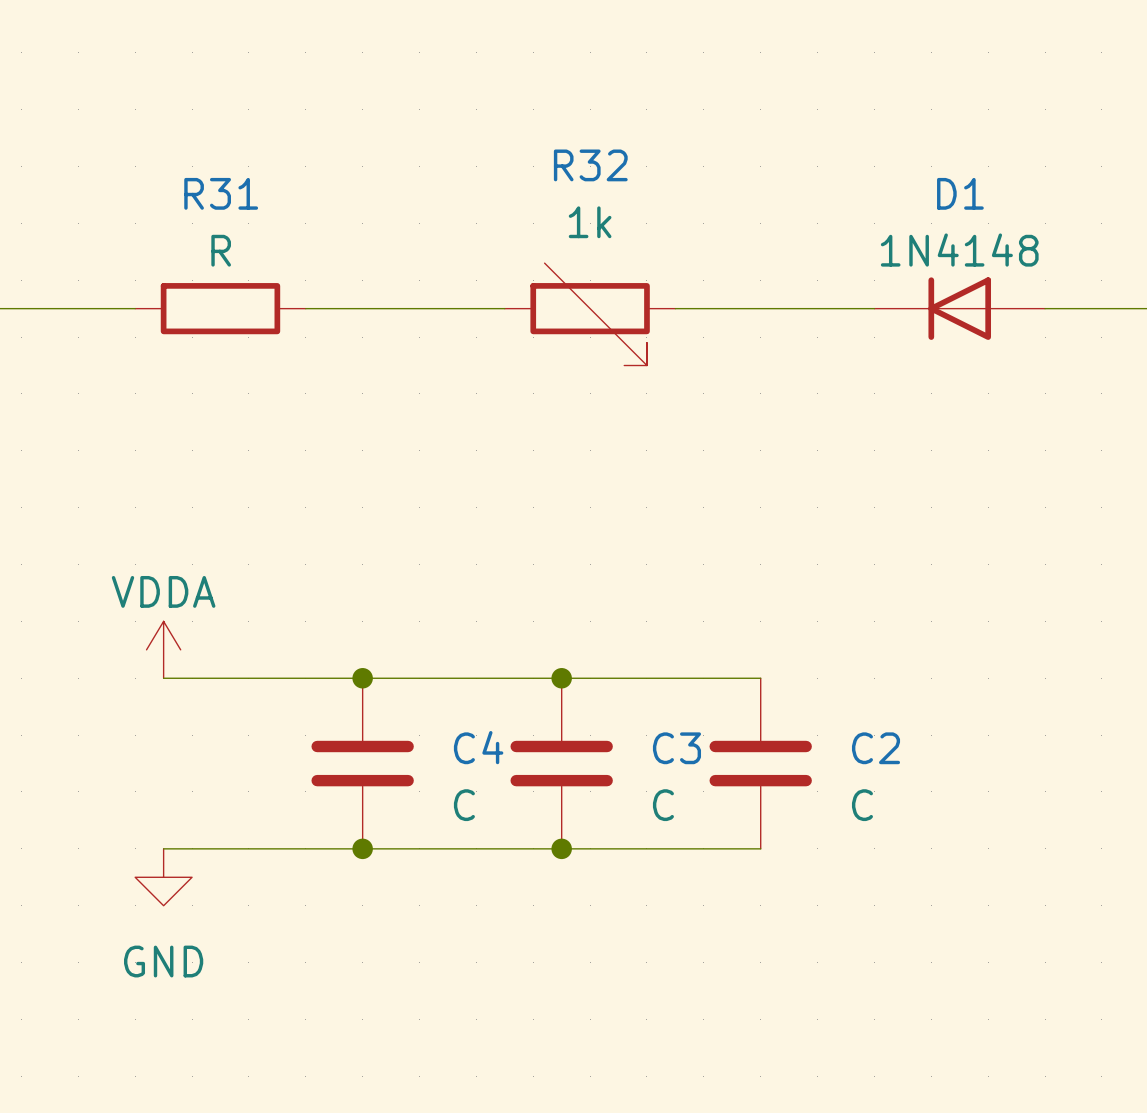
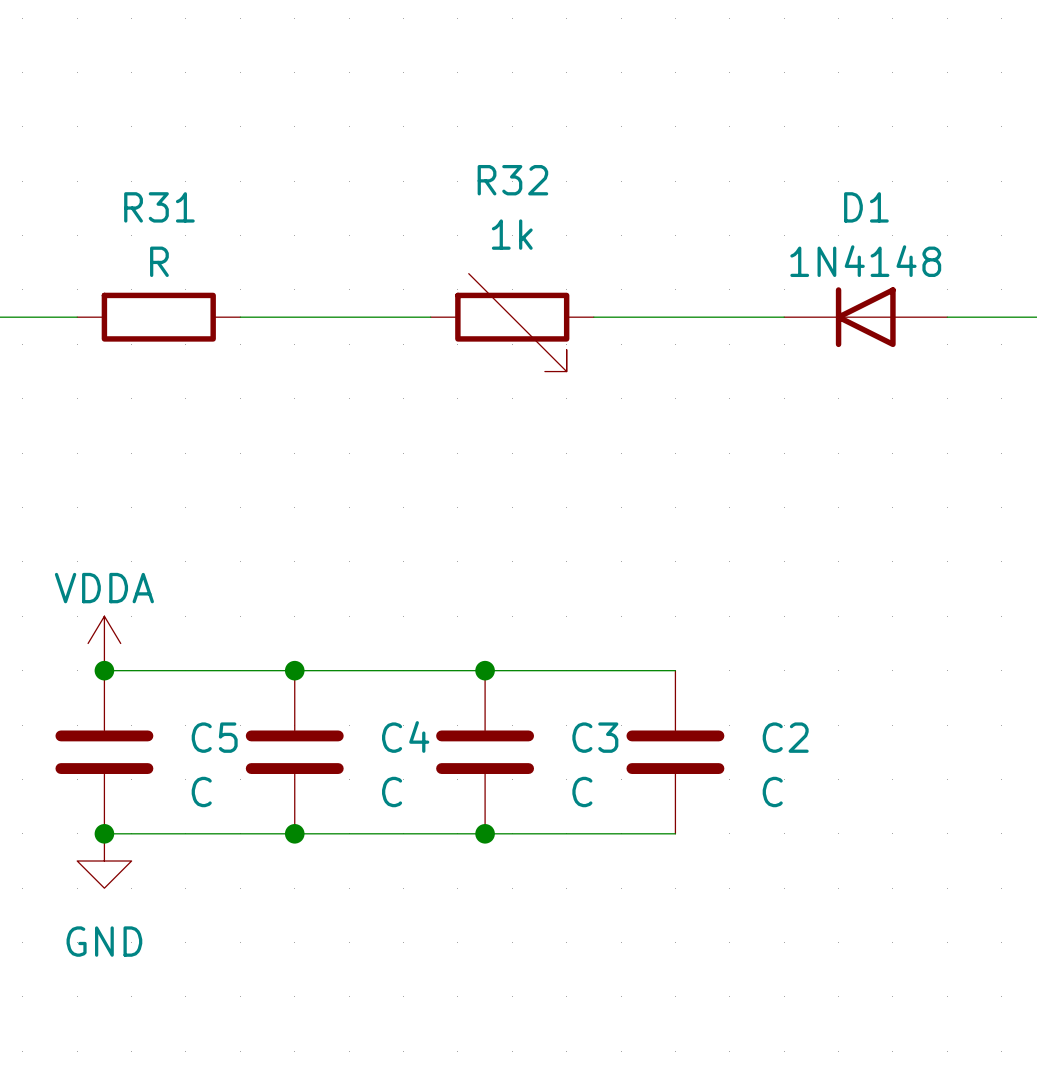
junction: none -> (104, 670)
C5: none -> C (104, 752)
junction: none -> (104, 833)

